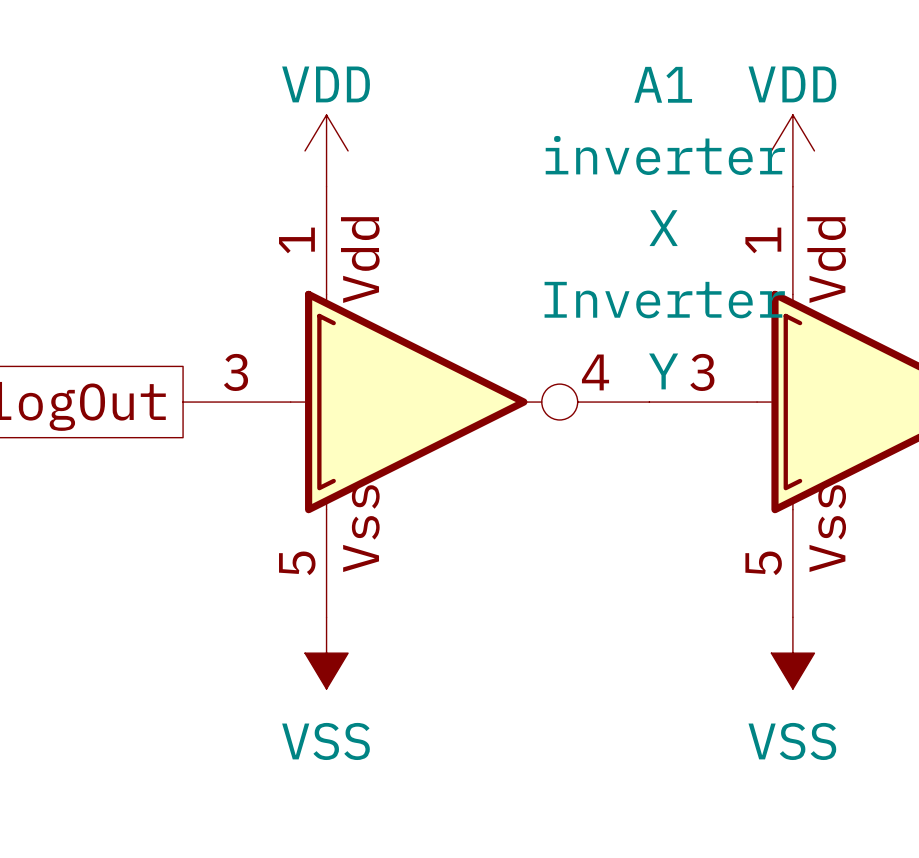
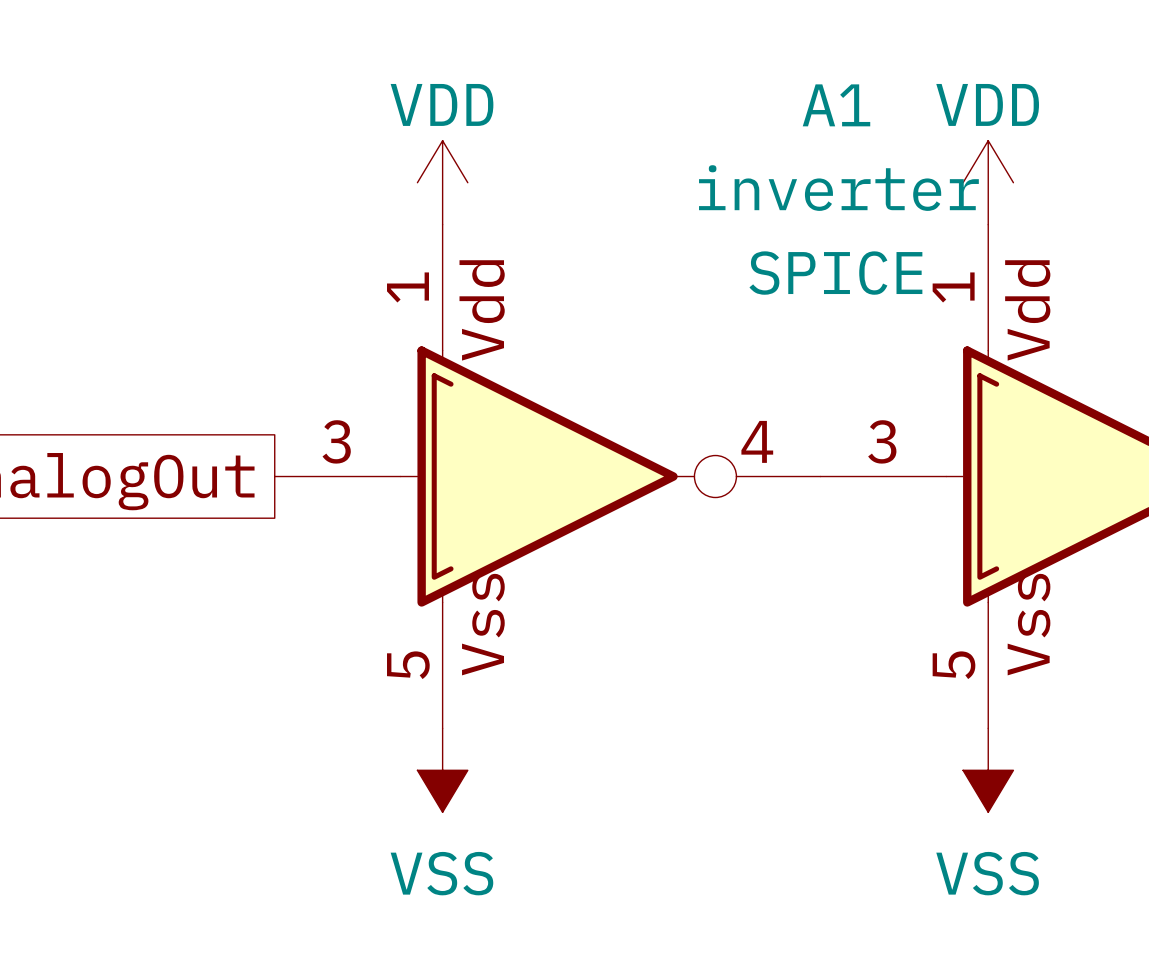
A1 text: none -> SPICE (835, 273)
A1 text: X (663, 228) -> none
A1 text: Inverter (664, 300) -> none
A1 text: Y (663, 371) -> none

